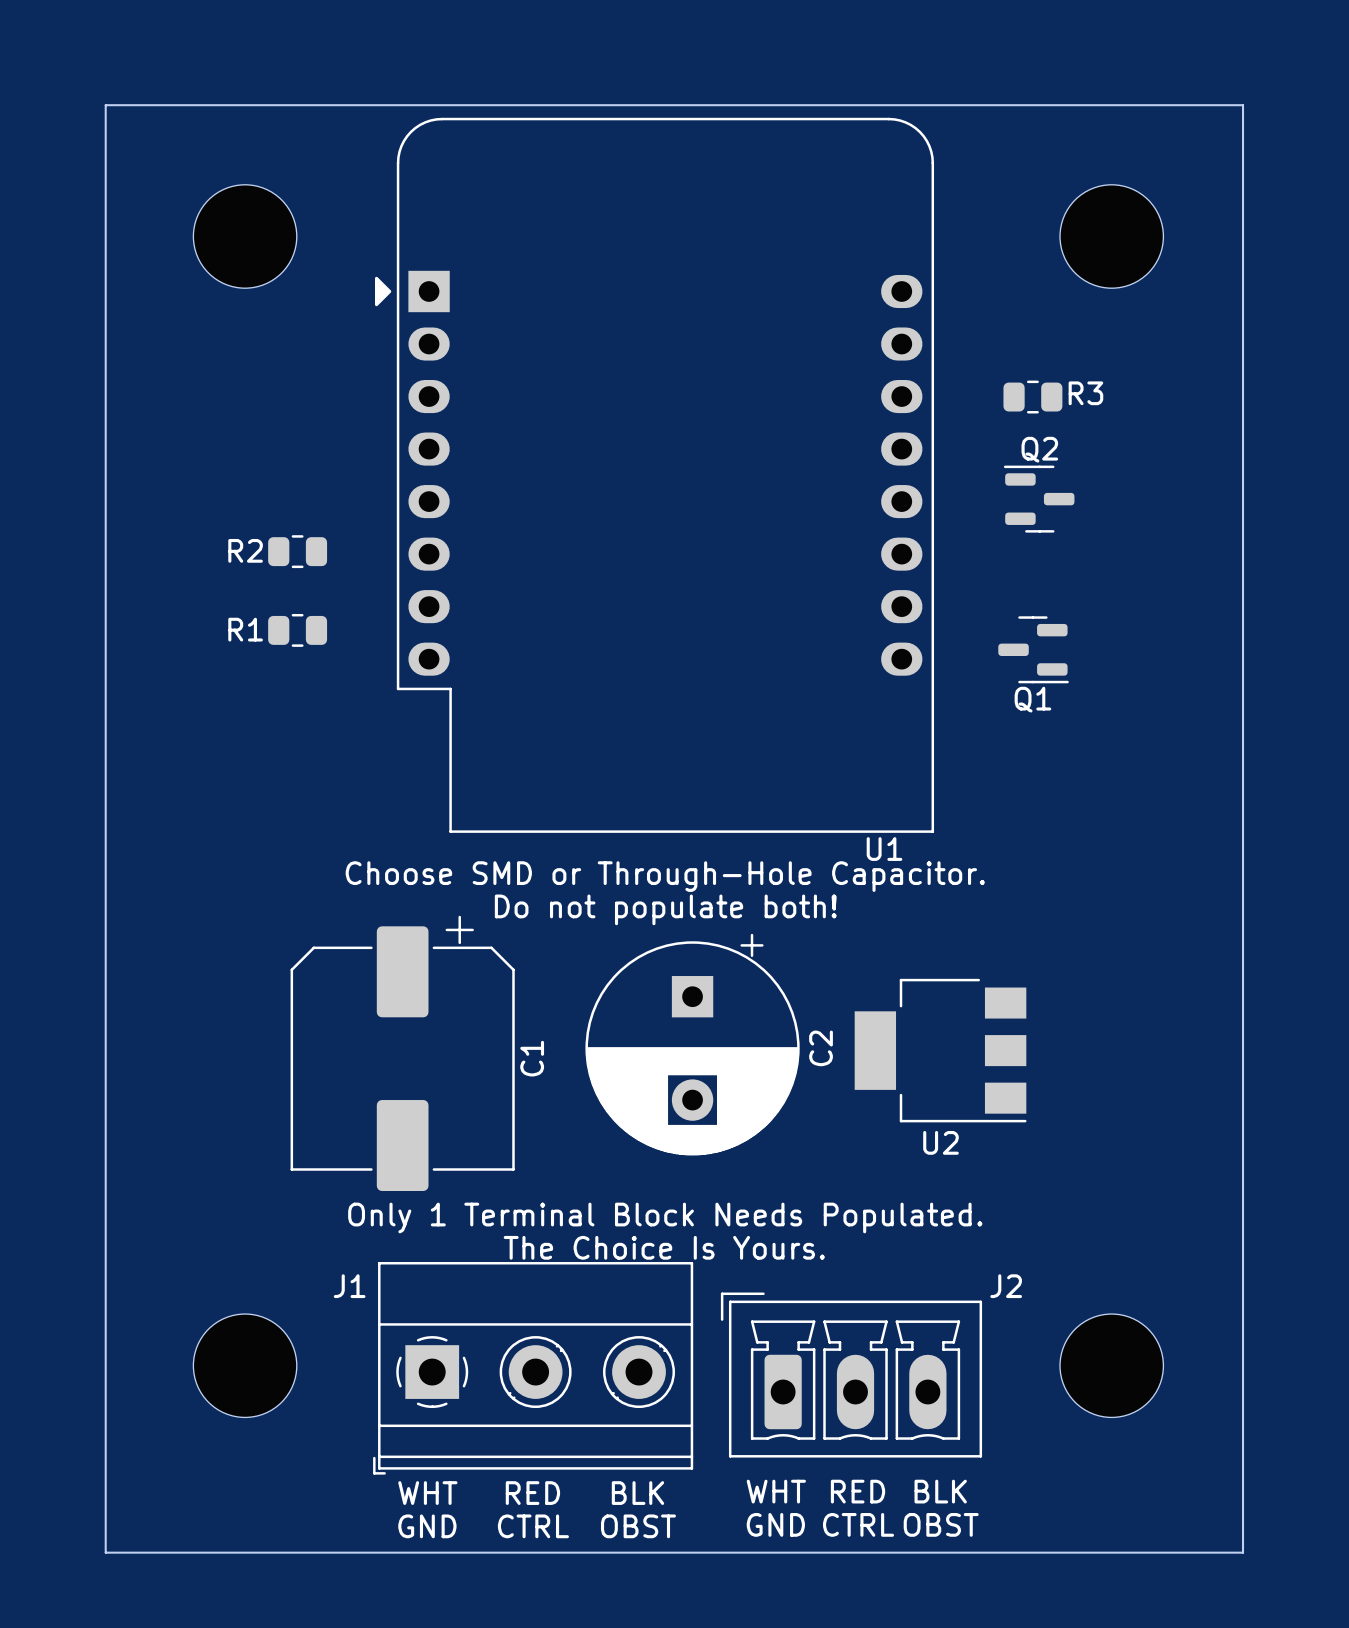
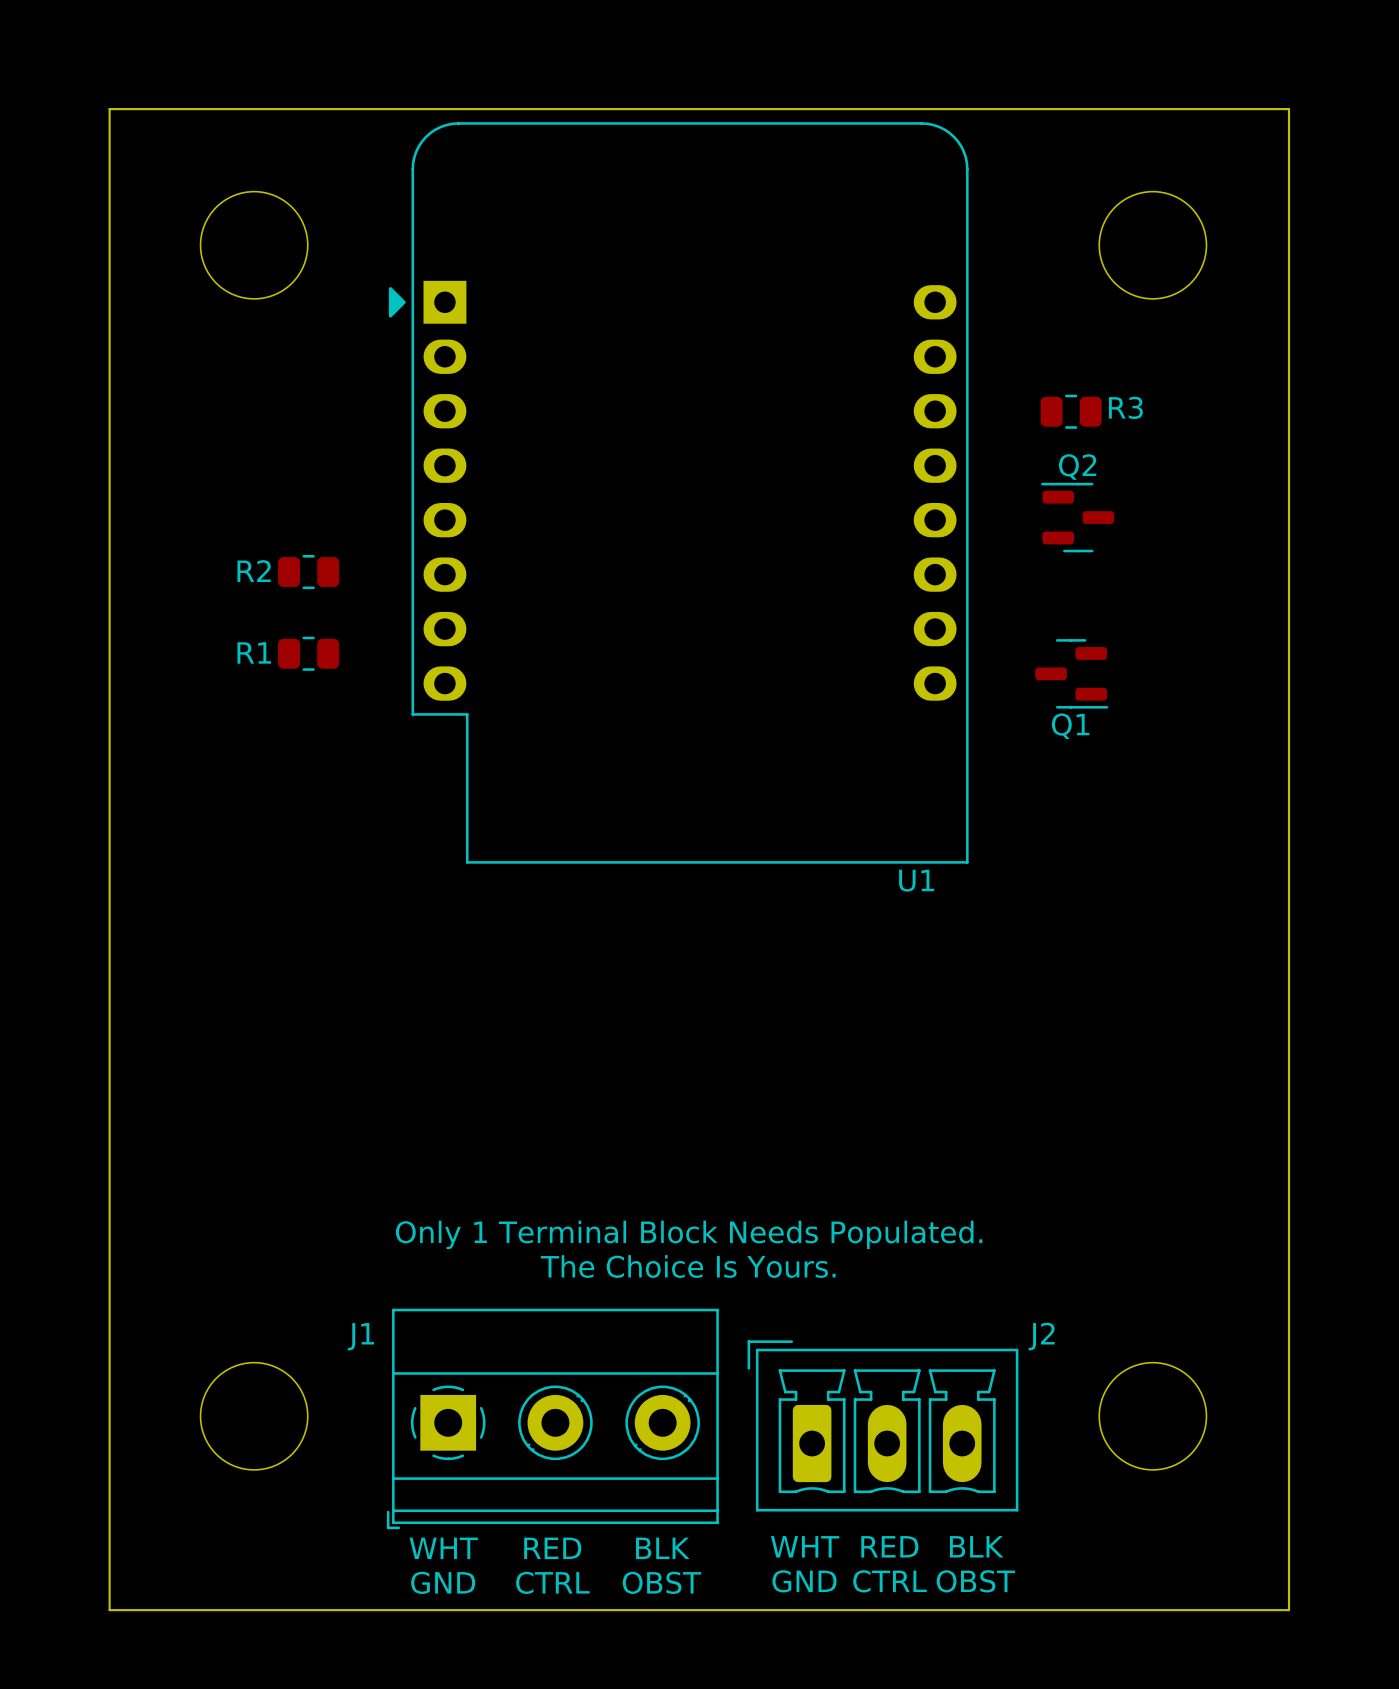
text: Choose SMD or Through-Hole Capacitor. (665, 876) -> none
text: Do not populate both! (665, 909) -> none
C2: (692, 1044) -> none
U2: (940, 1050) -> none
C1: (402, 1053) -> none
text: none -> Only 1 Terminal Block Needs Populated. (689, 1234)
text: Only 1 Terminal Block Needs Populated. (665, 1217) -> The Choice Is Yours. (688, 1266)
text: The Choice Is Yours. (664, 1247) -> none

